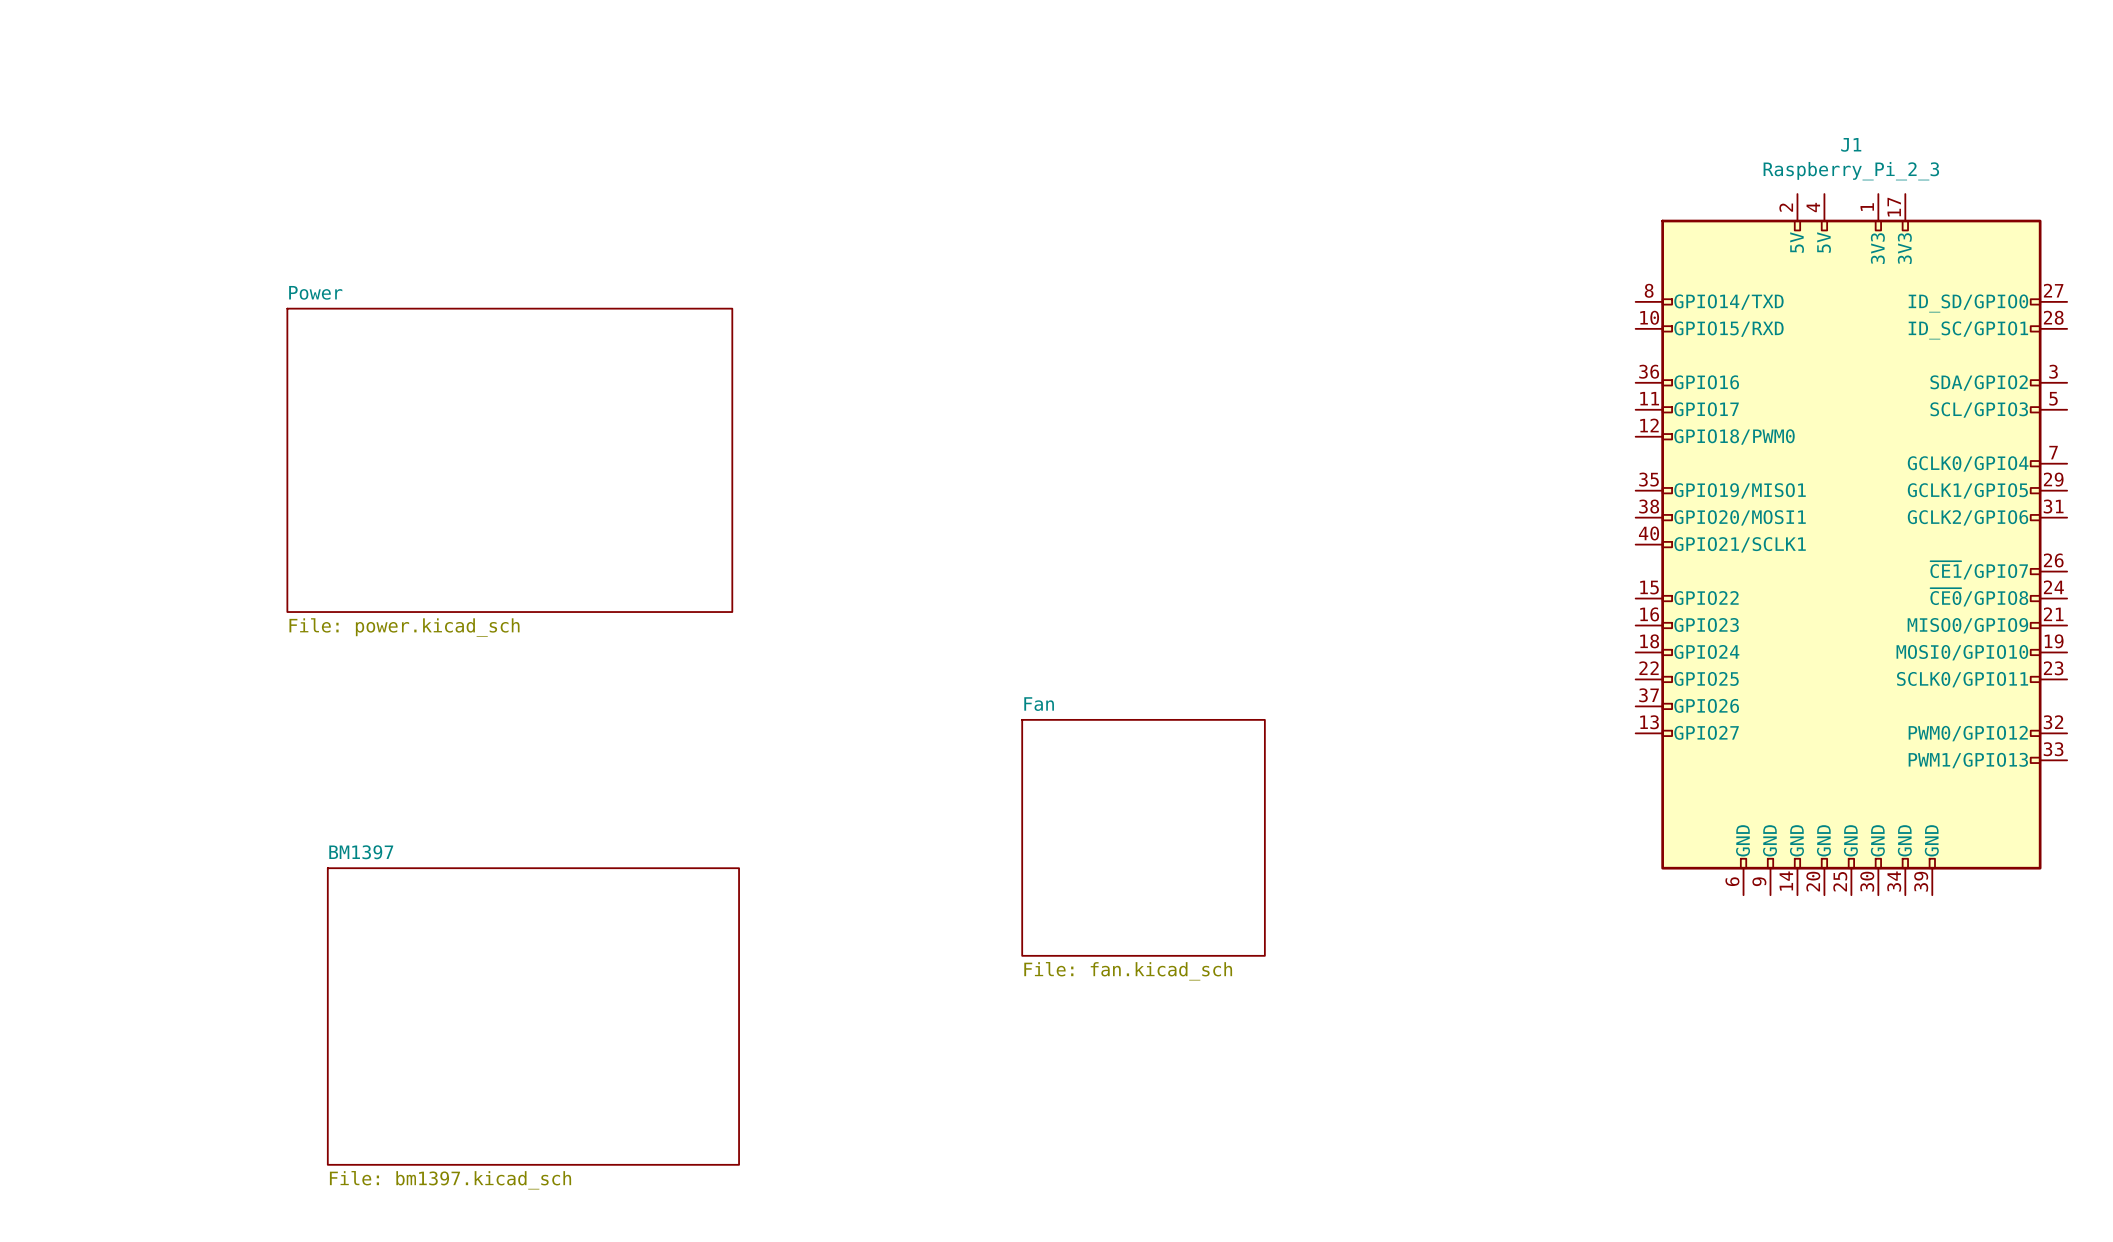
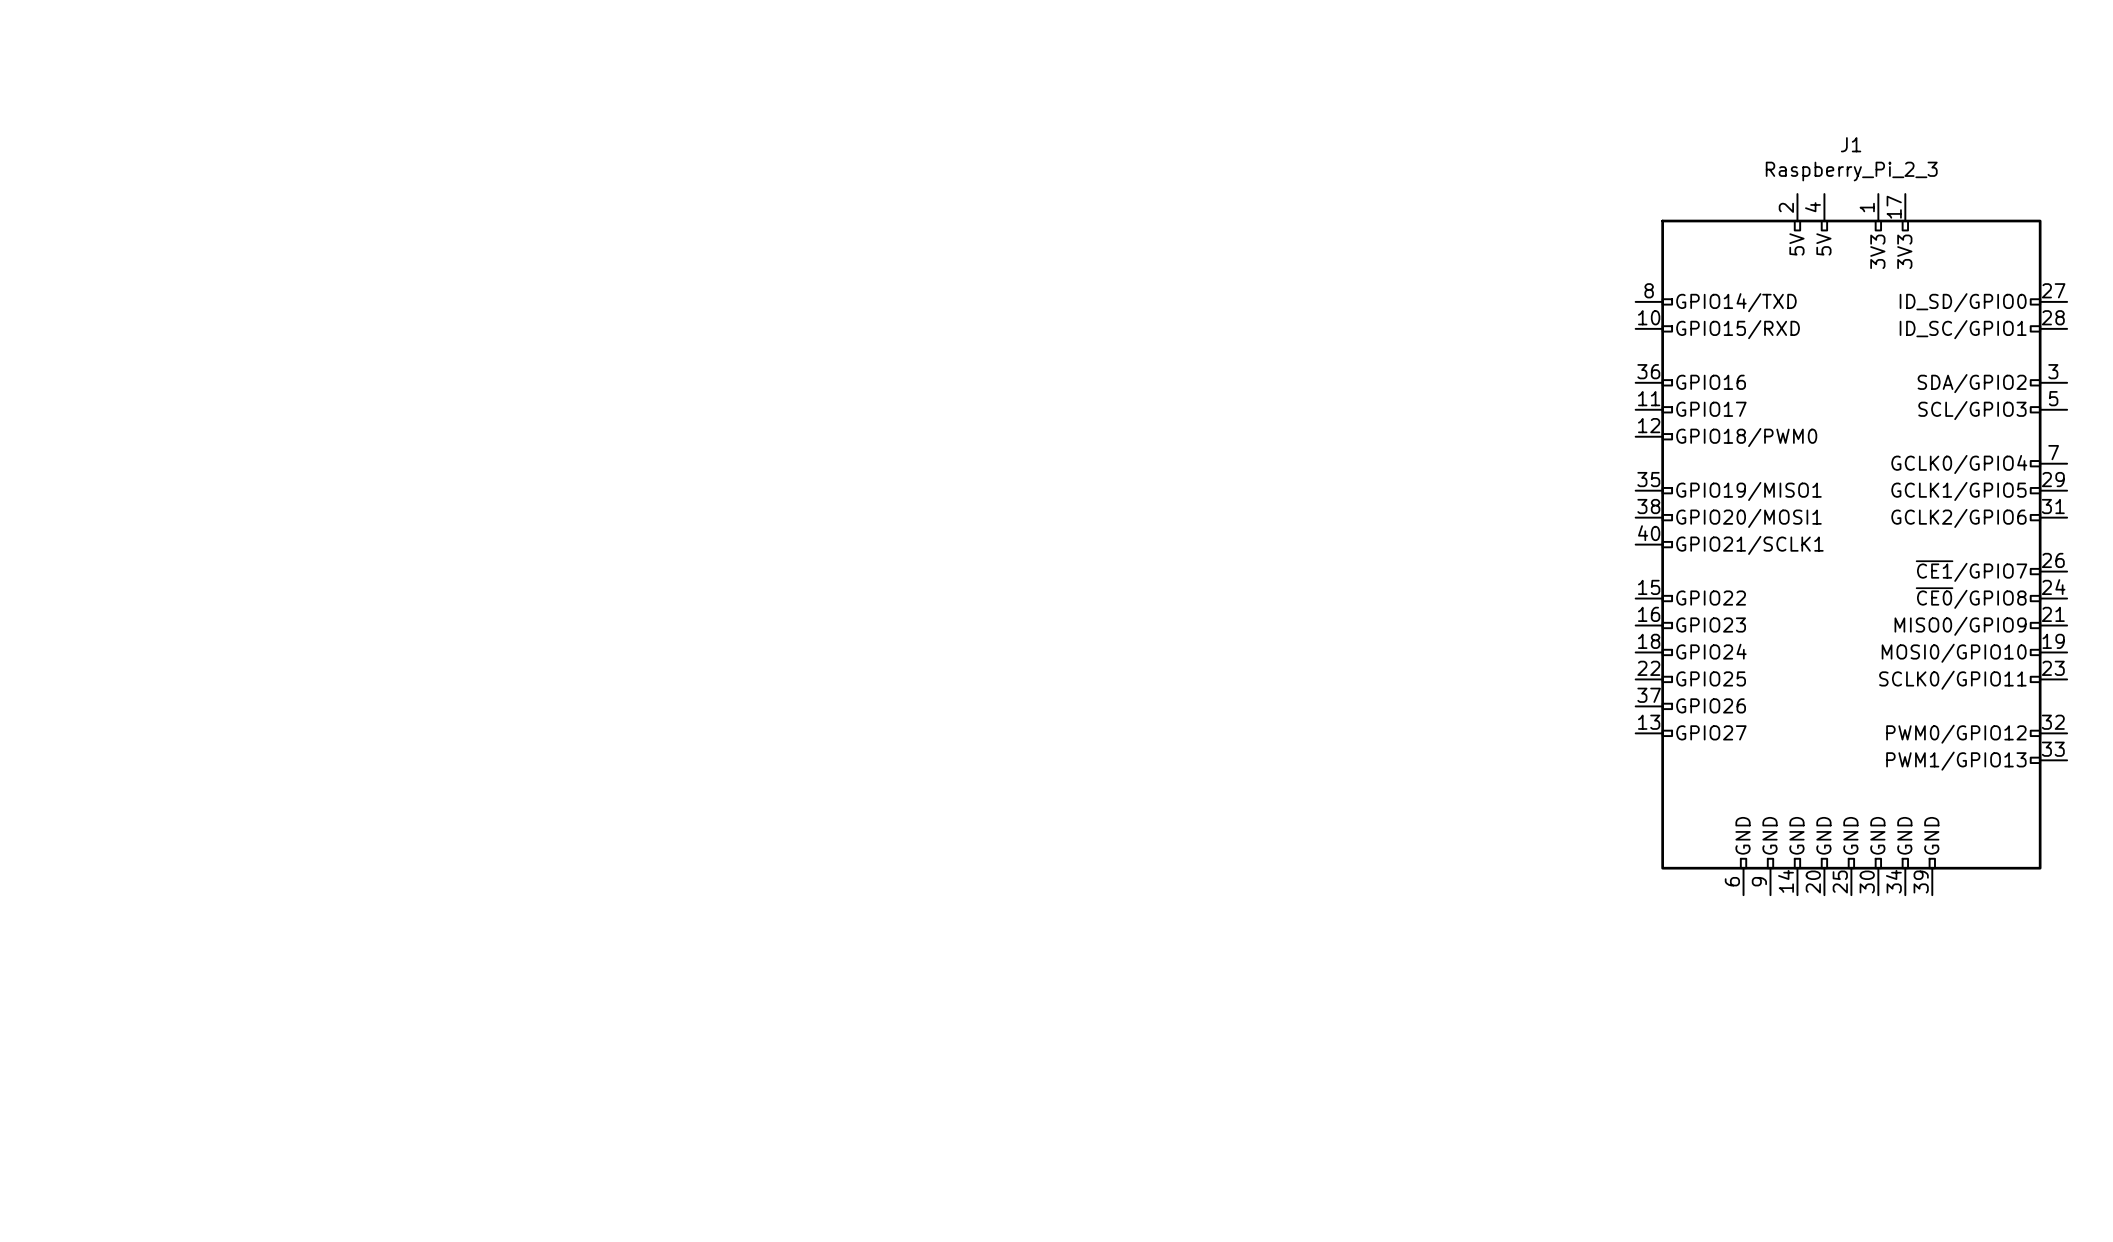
sheet Power: File: power.kicad_sch (509, 460) -> none
sheet Fan: File: fan.kicad_sch (1143, 837) -> none
sheet BM1397: File: bm1397.kicad_sch (533, 1016) -> none

